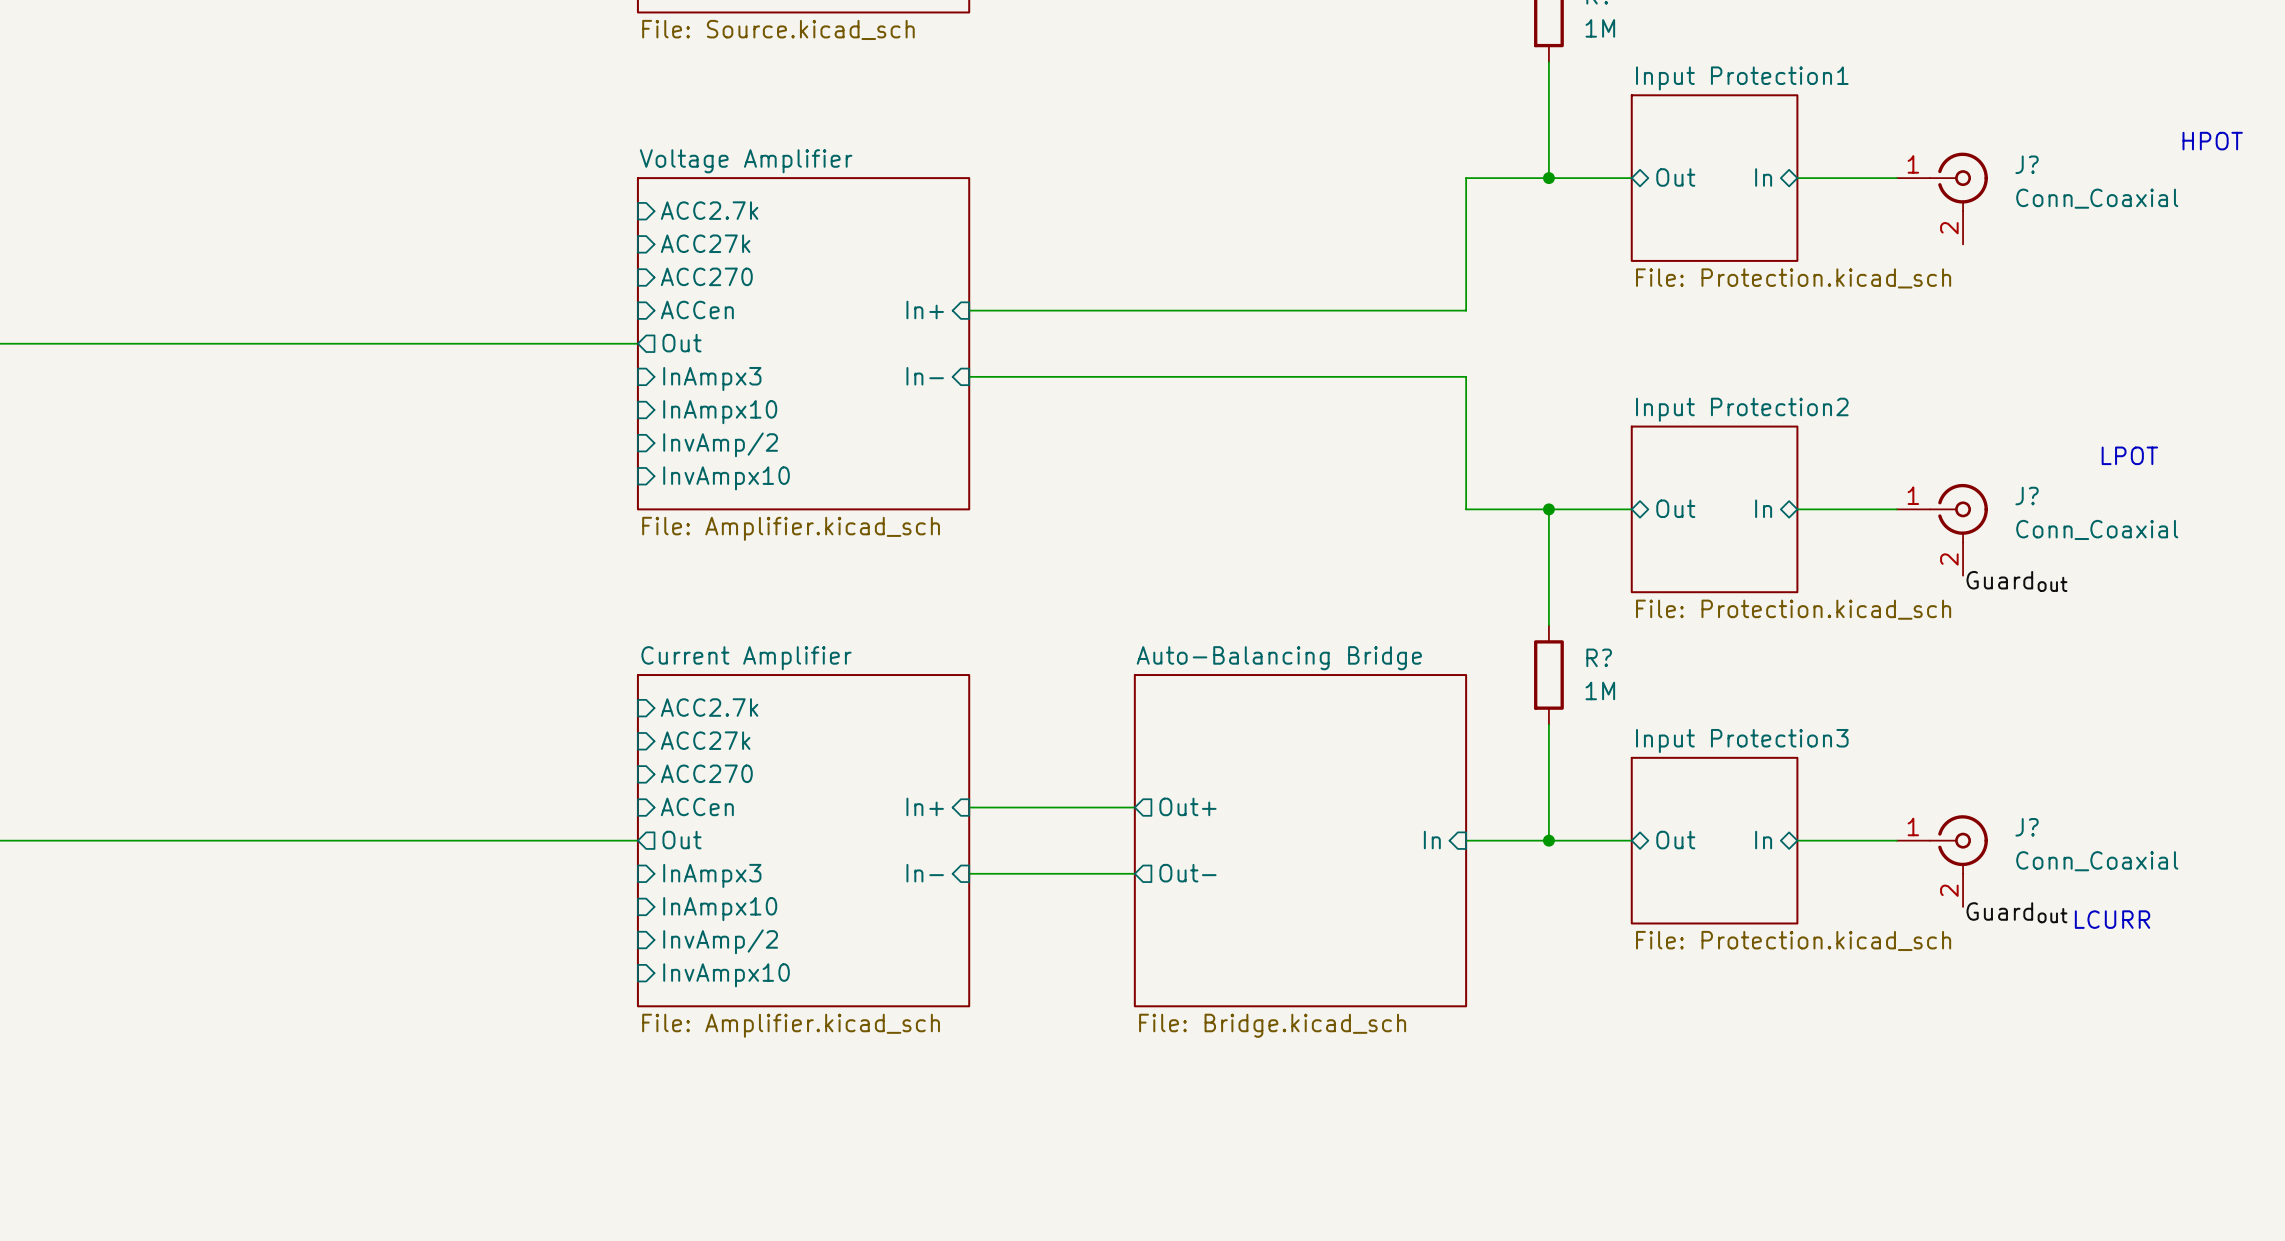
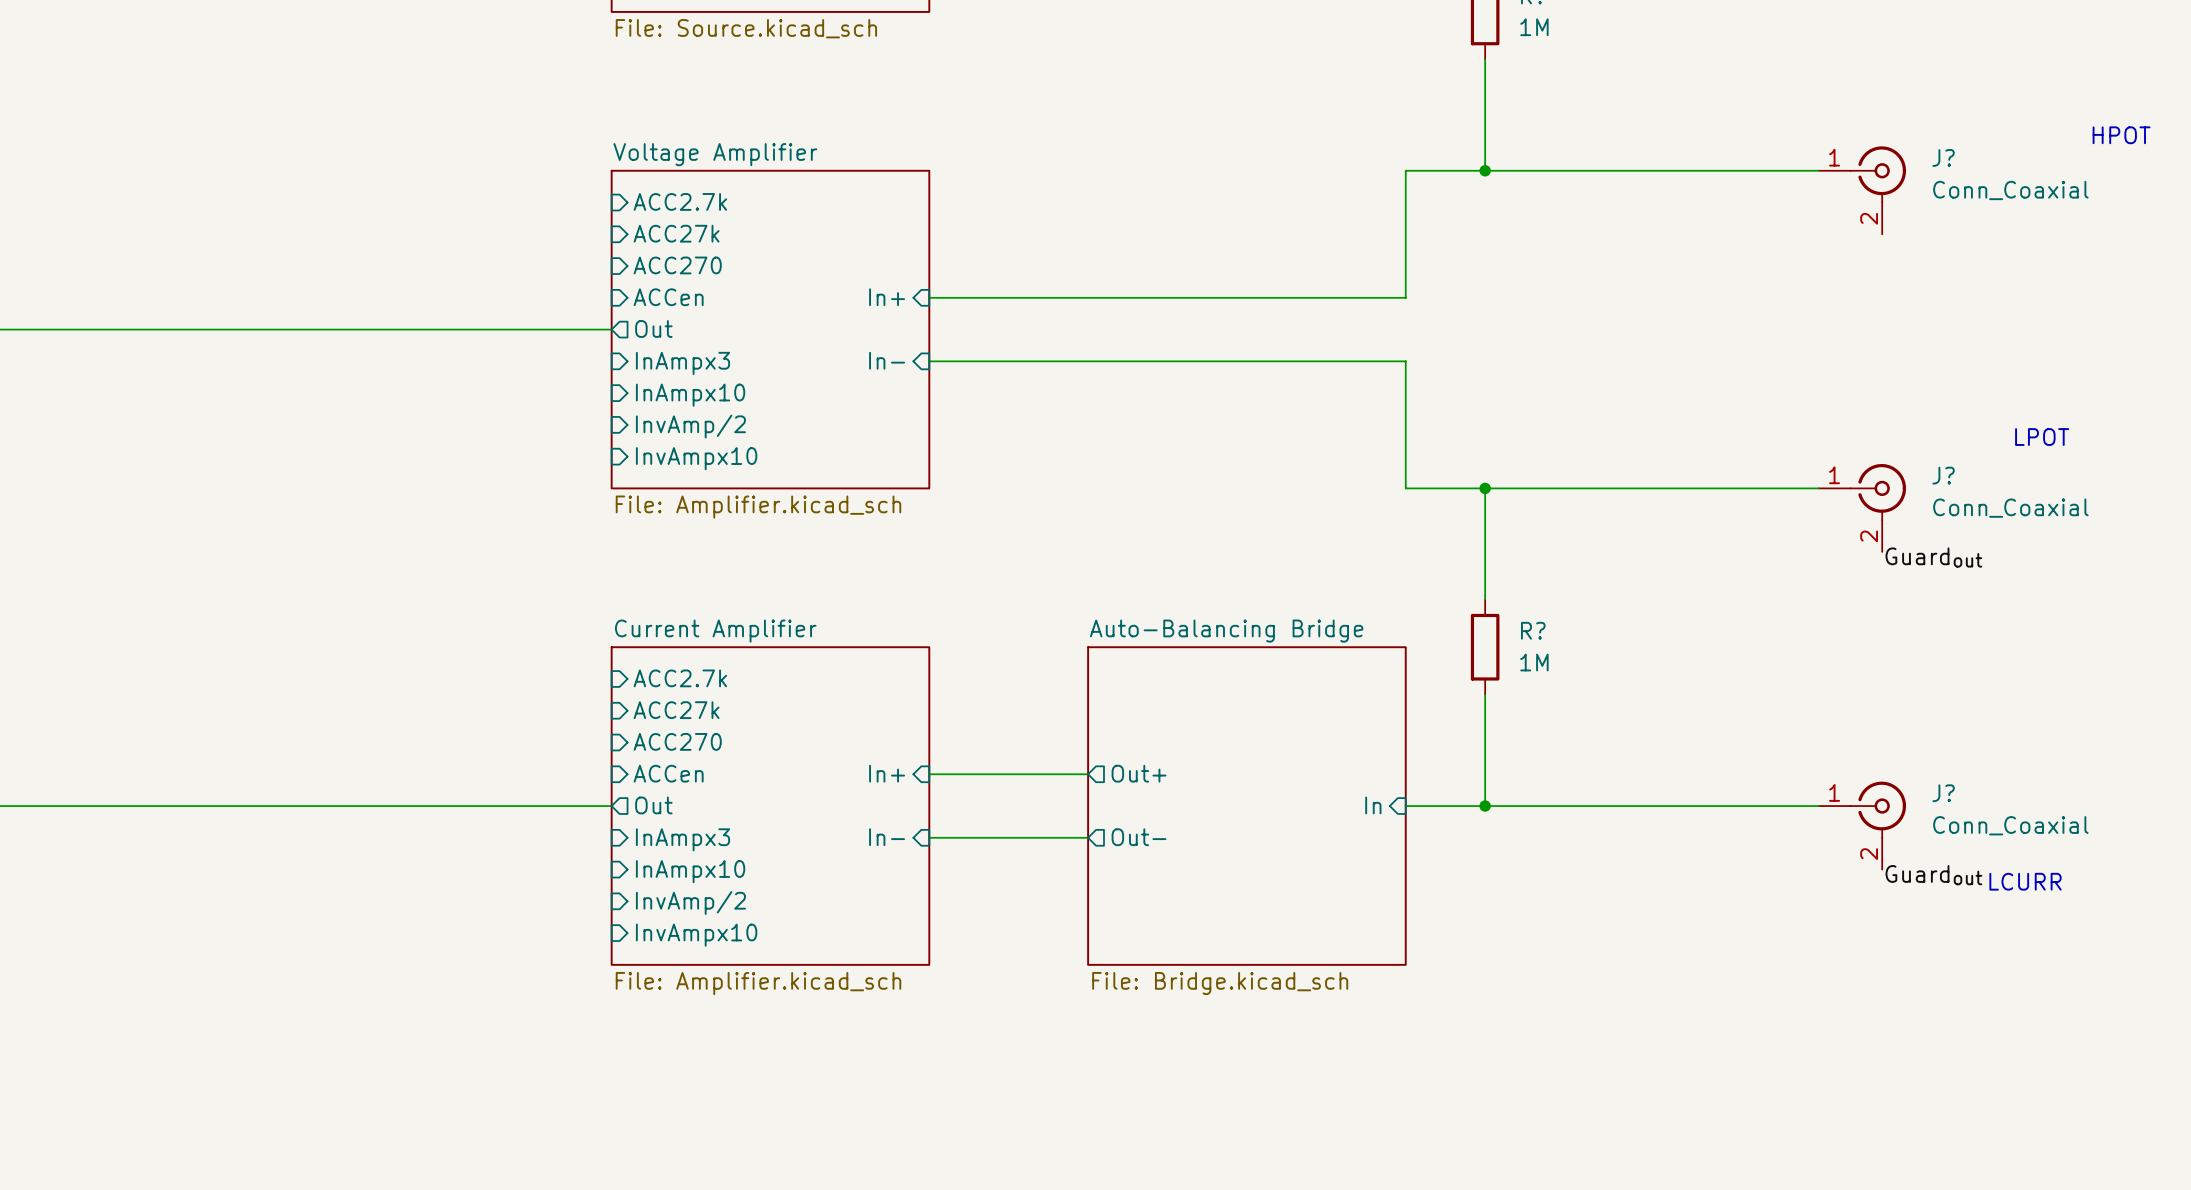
sheet pin: Out (1675, 177) -> none
sheet pin: In (1763, 177) -> none
wire: none -> (1564, 170) (1723, 170)
sheet Input Protection1: File: Protection.kicad_sch (1714, 178) -> none
sheet pin: Out (1675, 508) -> none
sheet pin: In (1763, 508) -> none
wire: none -> (1564, 488) (1723, 488)
sheet Input Protection2: File: Protection.kicad_sch (1714, 509) -> none
wire: none -> (1564, 806) (1723, 806)
sheet pin: Out (1675, 840) -> none
sheet Input Protection3: File: Protection.kicad_sch (1714, 840) -> none
sheet pin: In (1763, 840) -> none

